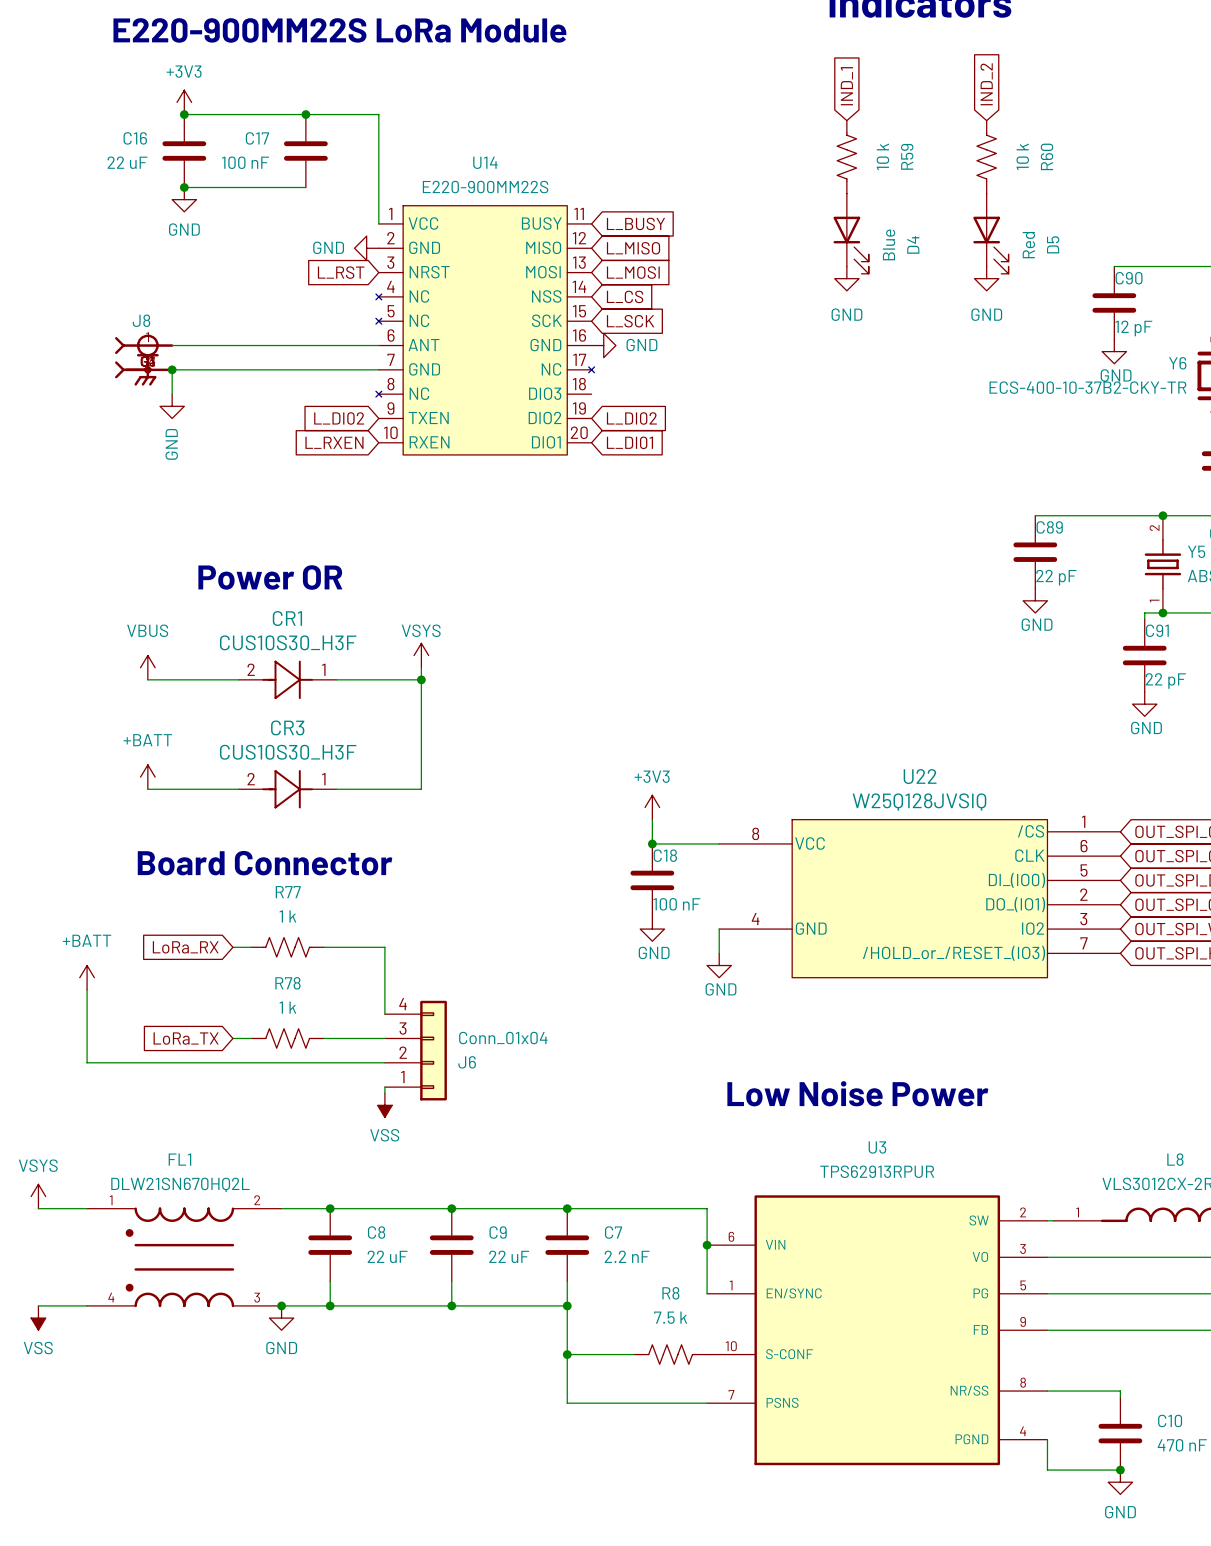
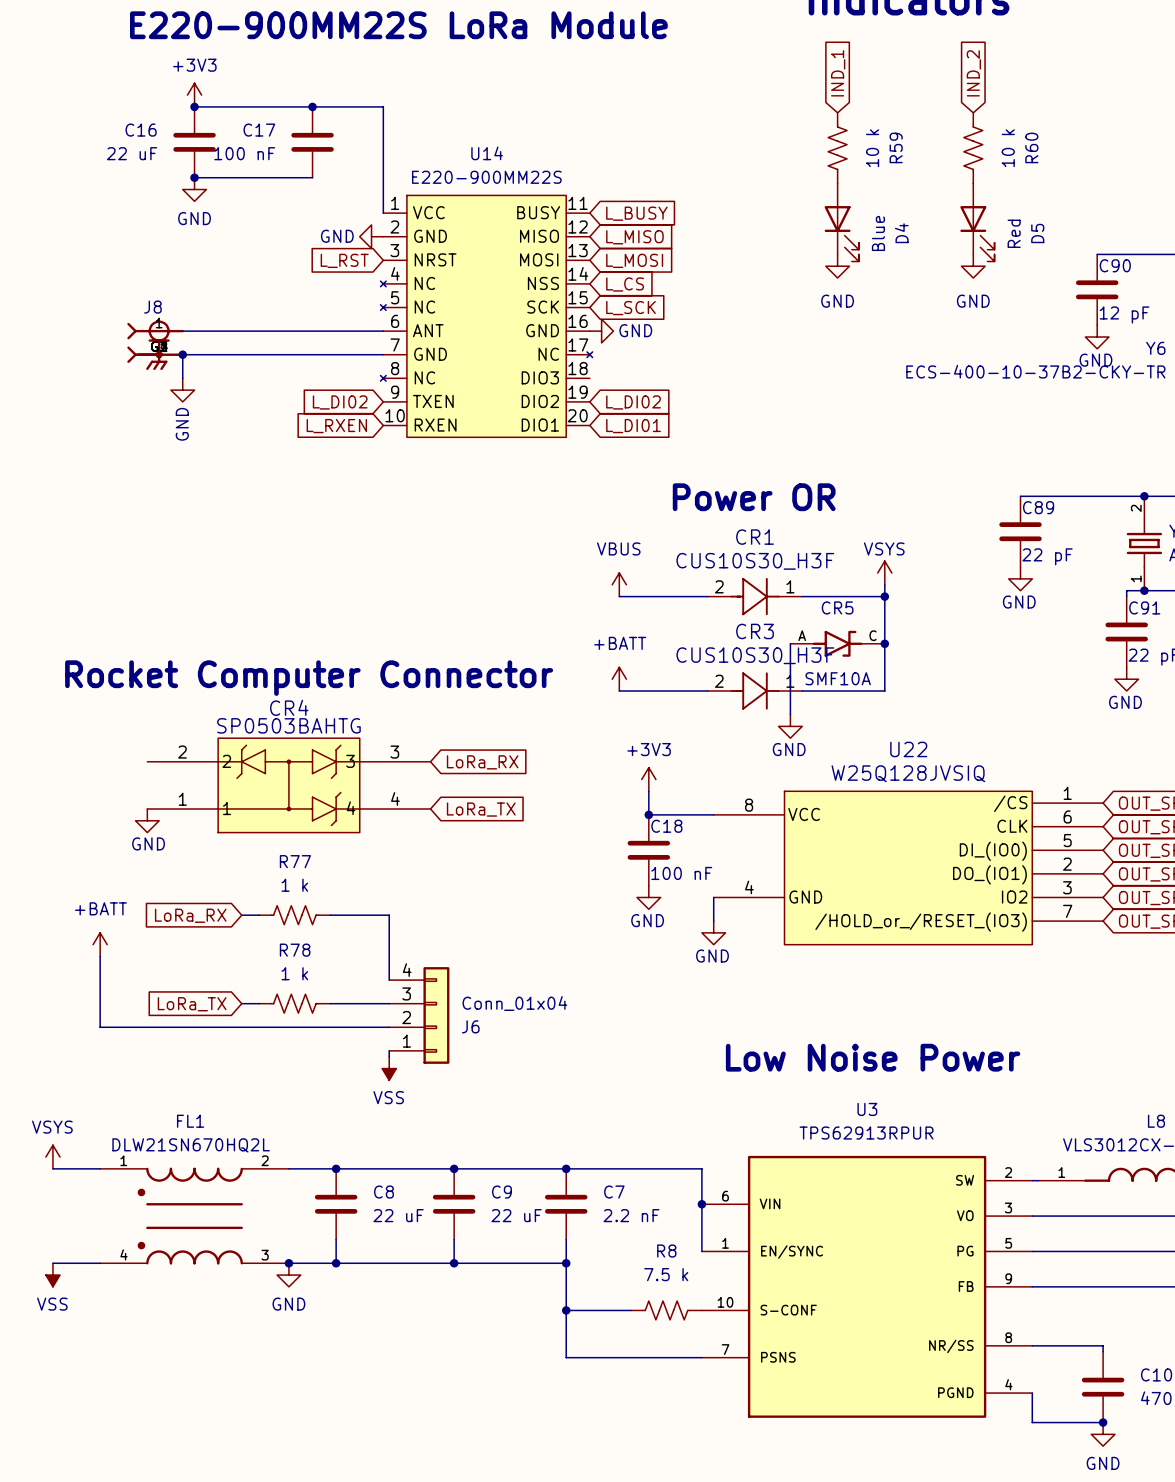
text: none -> Power OR (754, 497)
text: Power OR (270, 577) -> none
power symbol: none -> VSYS (884, 573)
power symbol: none -> VBUS (619, 584)
wire: none -> (884, 584) (884, 691) (802, 691)
wire: none -> (619, 596) (707, 596)
wire: none -> (802, 596) (884, 596)
junction: none -> (884, 596)
power symbol: VSYS (421, 655) -> none
power symbol: VBUS (147, 667) -> none
wire: (421, 667) (421, 789) (336, 789) -> none
wire: none -> (790, 643) (790, 714)
CR5: none -> SMF10A (837, 643)
junction: none -> (884, 643)
wire: (147, 679) (239, 679) -> none
CR1 position: (287, 679) -> (755, 596)
wire: (336, 679) (421, 679) -> none
junction: (421, 679) -> none
text: none -> Rocket Computer Connector (309, 678)
power symbol: none -> +BATT (619, 679)
wire: none -> (619, 691) (707, 691)
power symbol: none -> GND (790, 726)
power symbol: +BATT (147, 777) -> none
CR3 position: (287, 789) -> (755, 691)
global label: none -> LoRa_RX (482, 762)
CR4: none -> SP0503BAHTG (288, 785)
global label: none -> LoRa_TX (481, 809)
power symbol: none -> GND (147, 820)
text: Board Connector (265, 863) -> none

